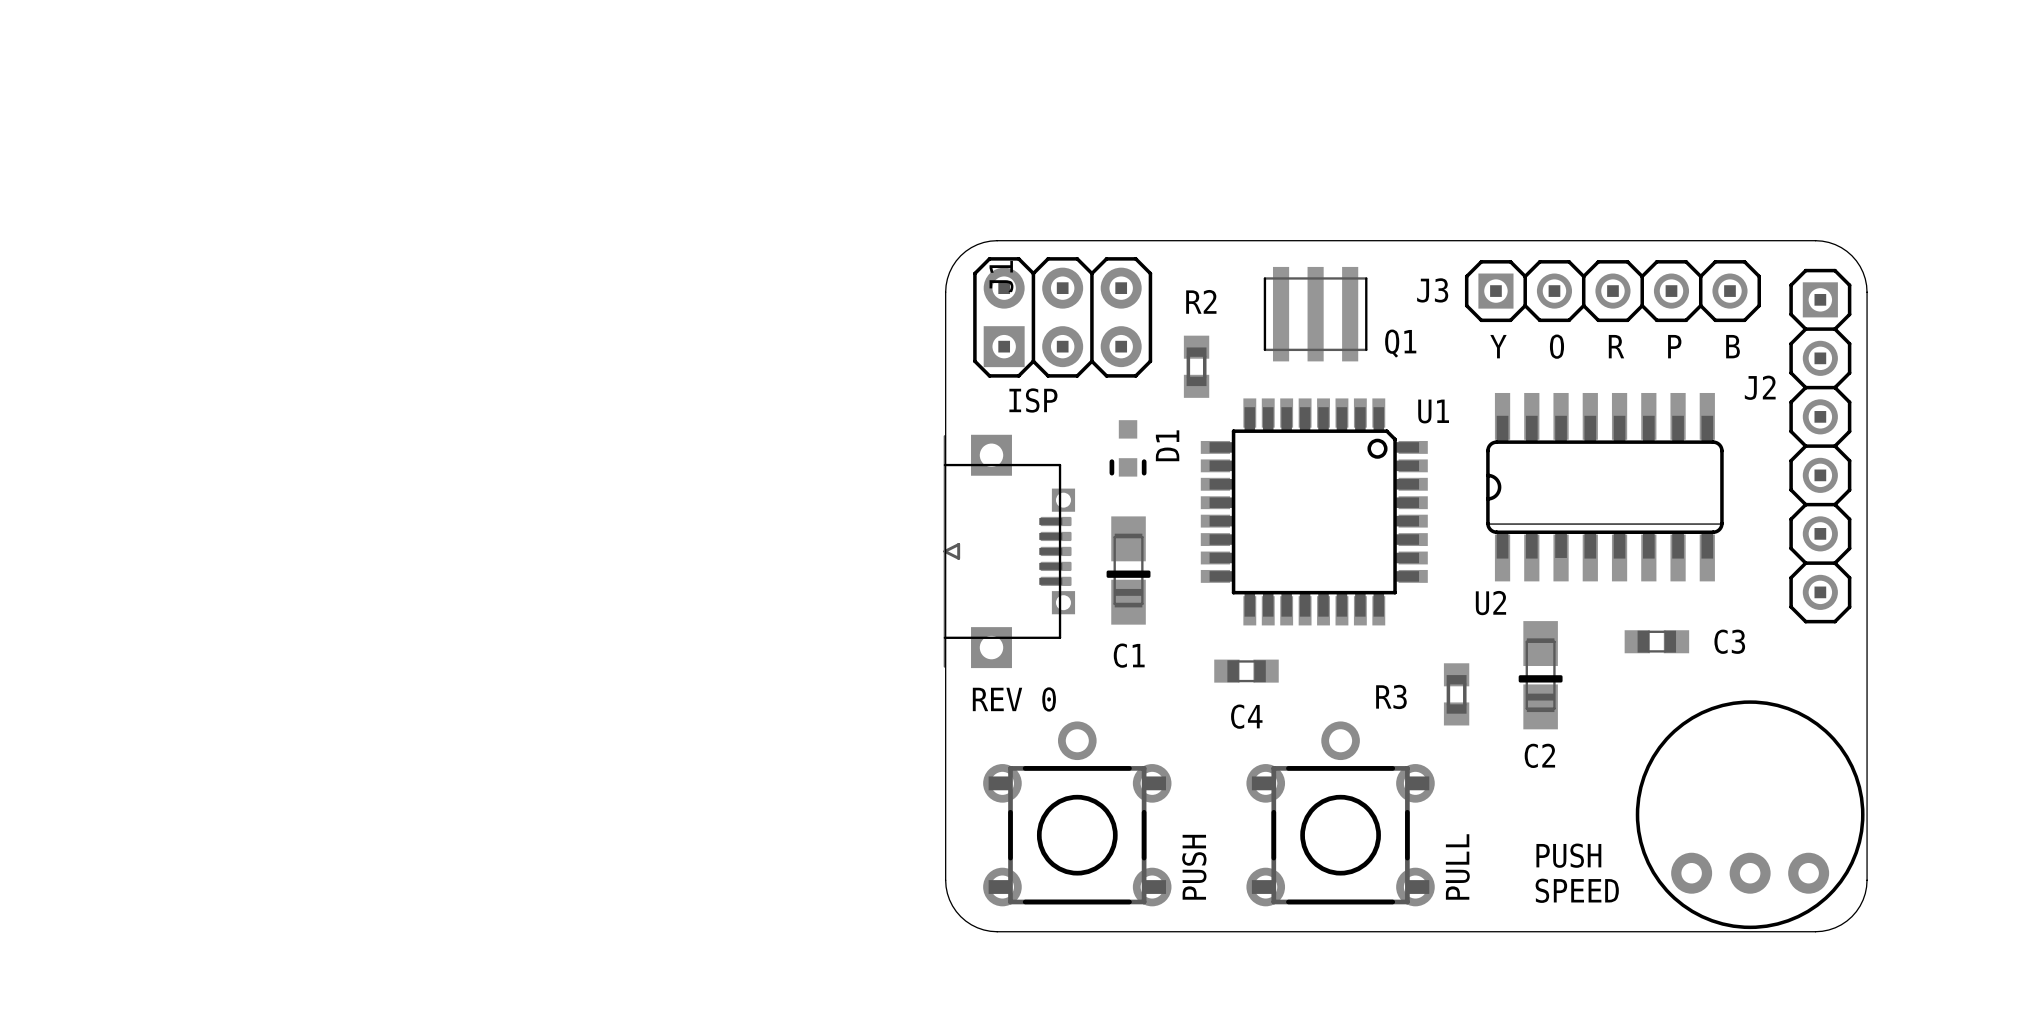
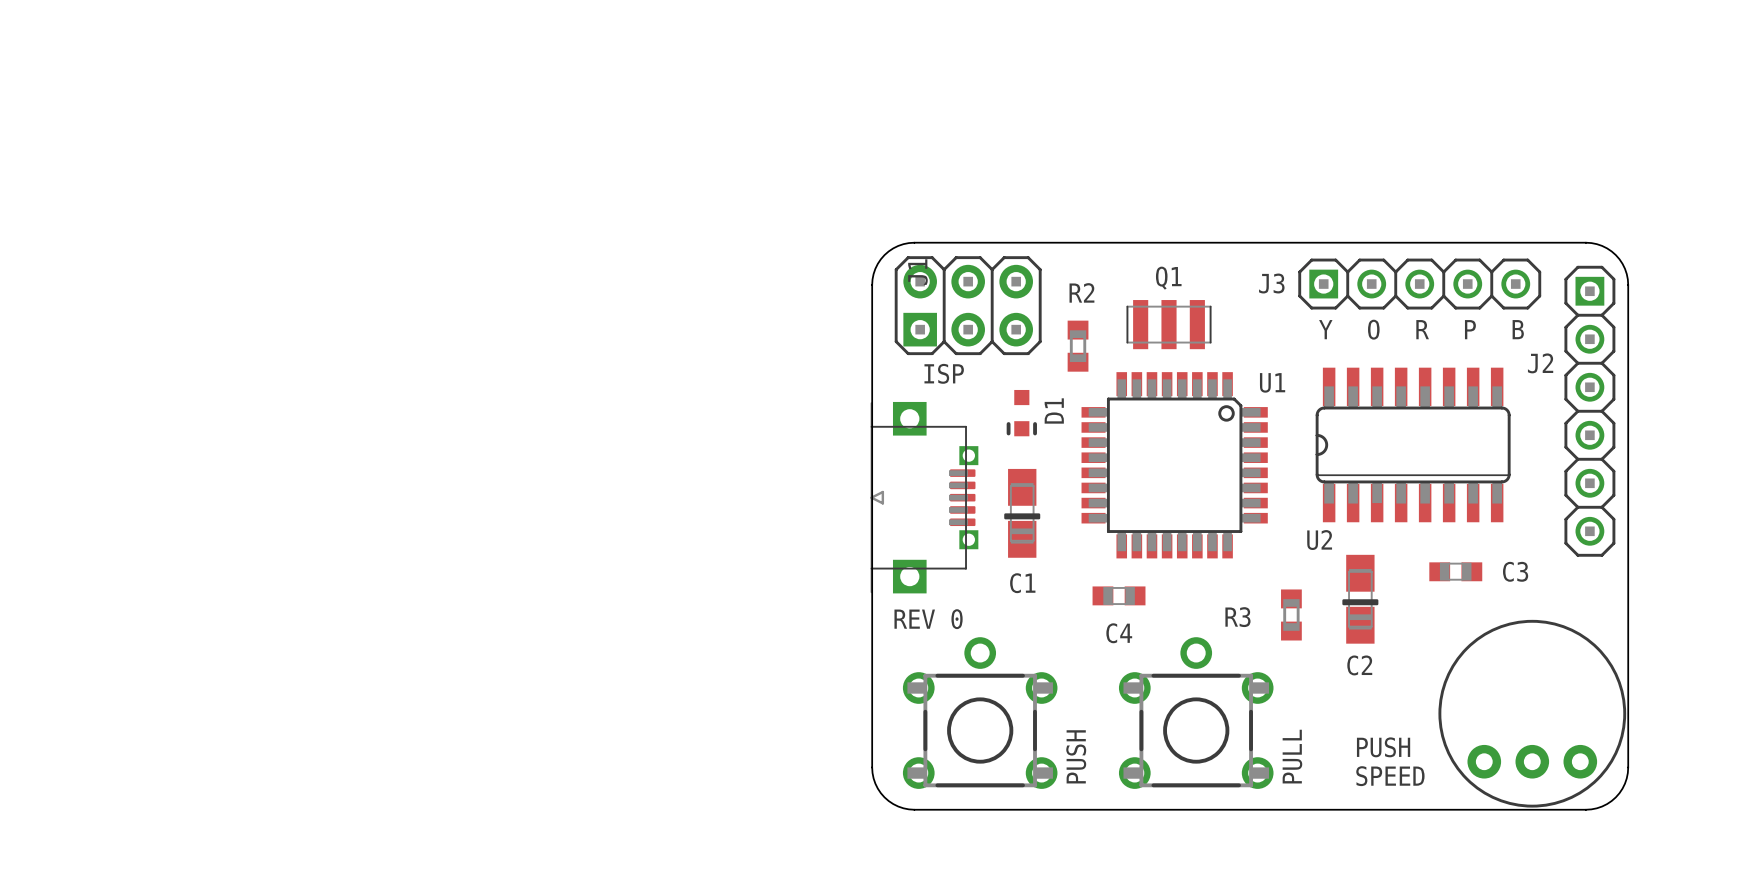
Q1 footprint: [1263, 266, 1368, 362] -> [1126, 300, 1212, 350]
Q1 name position: Q1 (1400, 343) -> Q1 (1168, 278)

